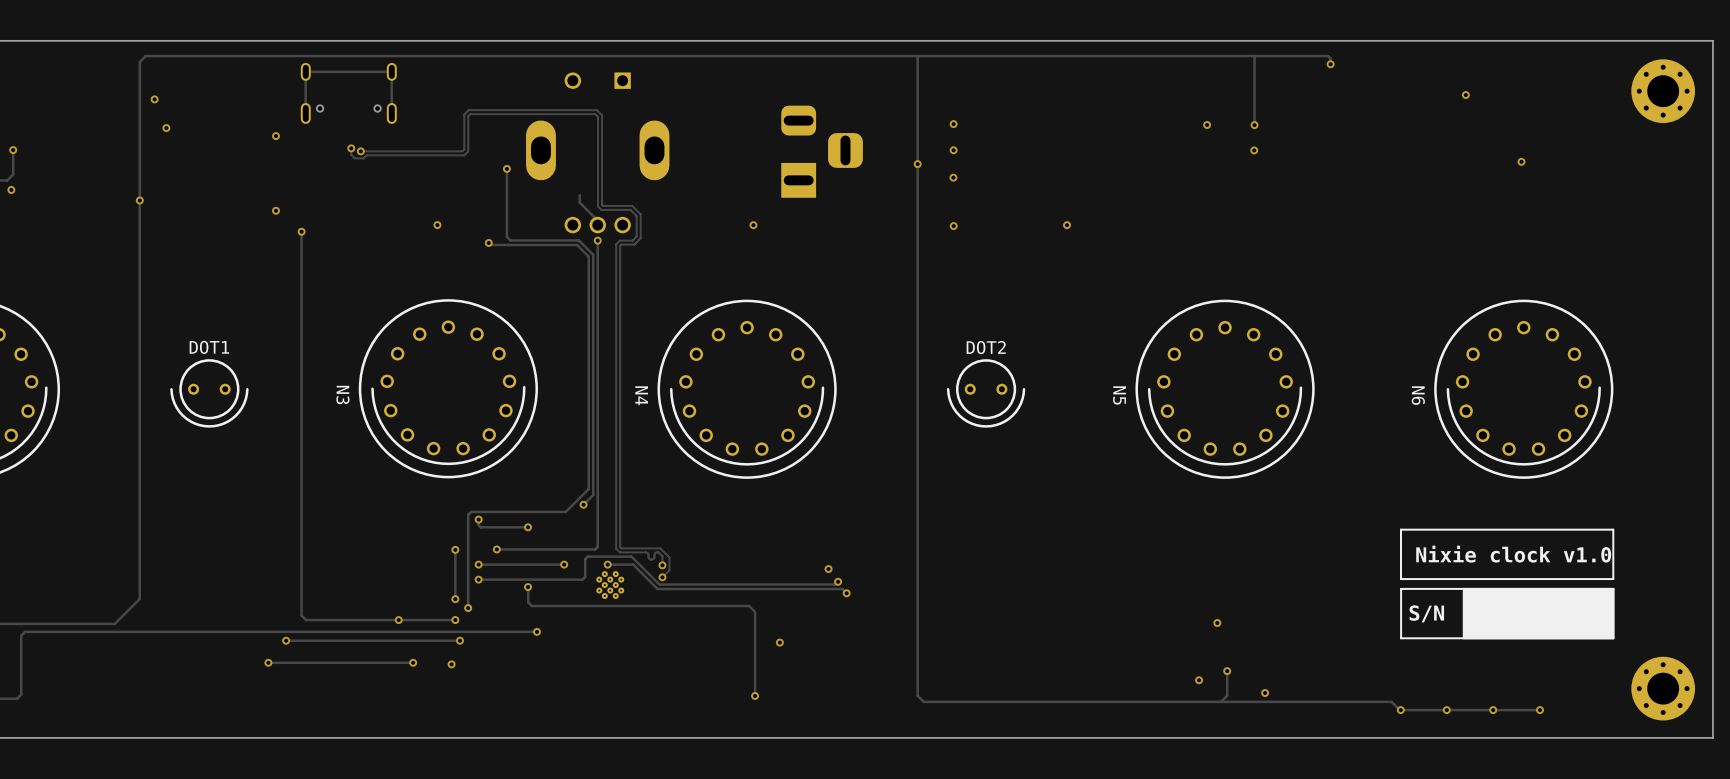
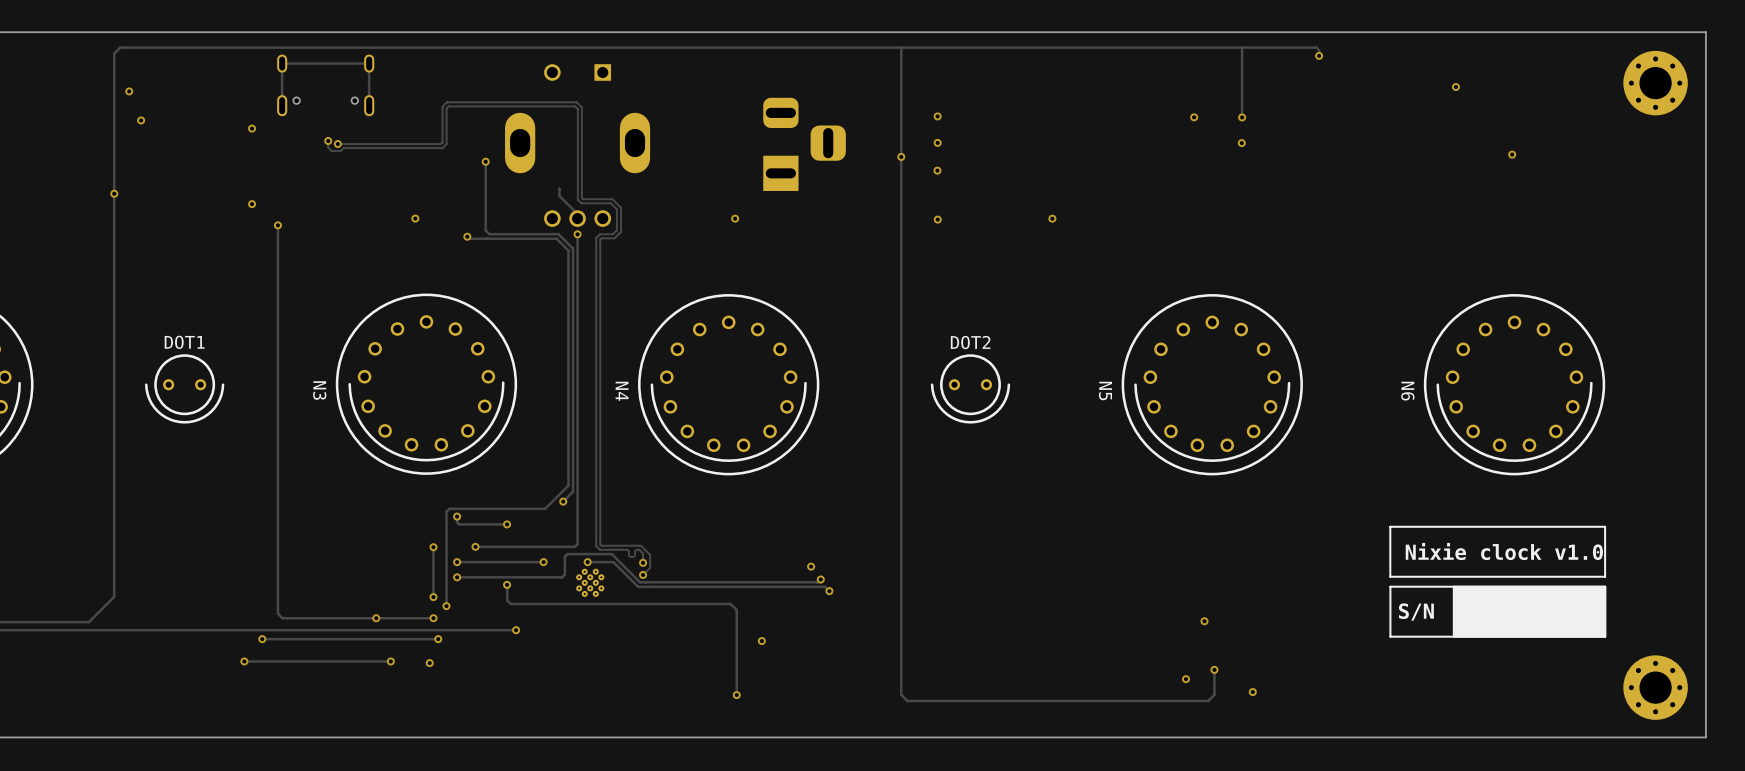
track: (1221, 701) (1391, 701) (1399, 710) (1540, 710) -> none
via: (1400, 710) -> none
via: (1446, 710) -> none
via: (1493, 710) -> none
via: (1540, 710) -> none

